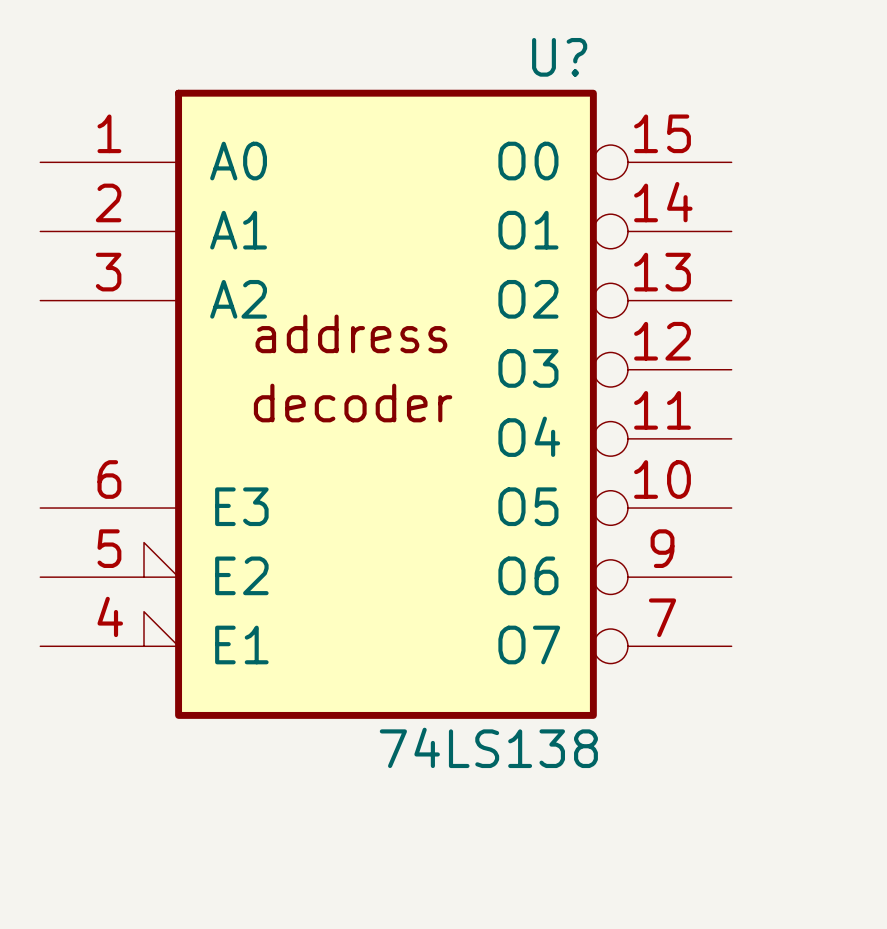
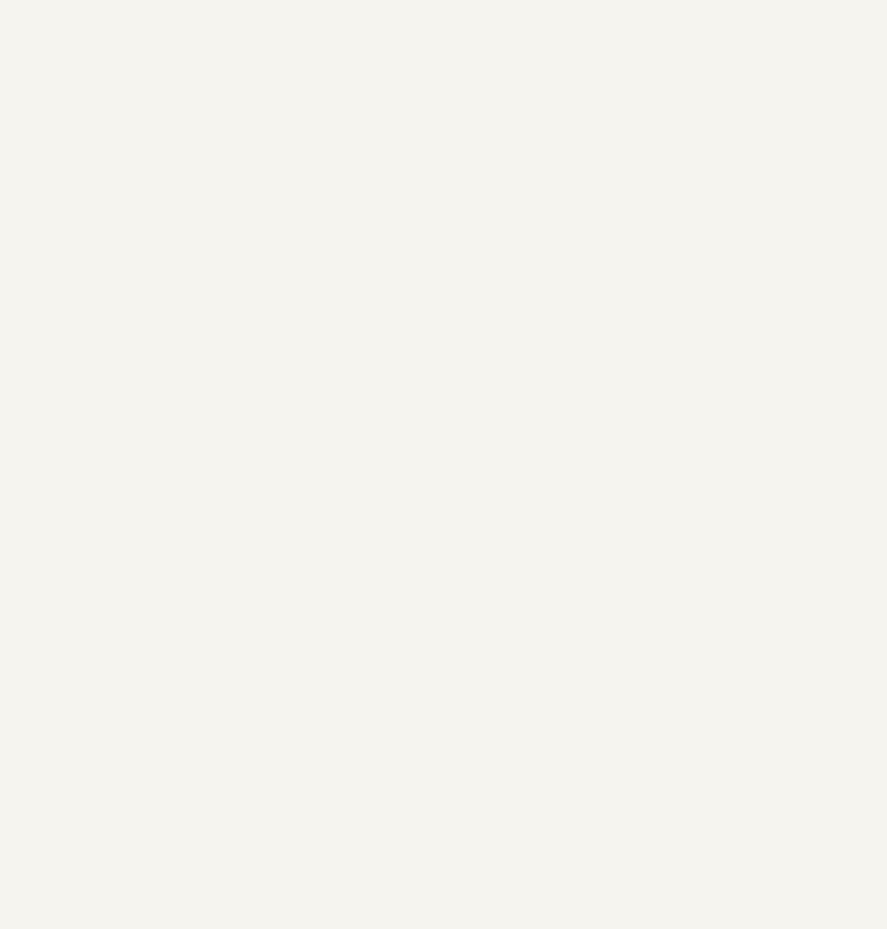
U?: 74LS138 (385, 404) -> none

